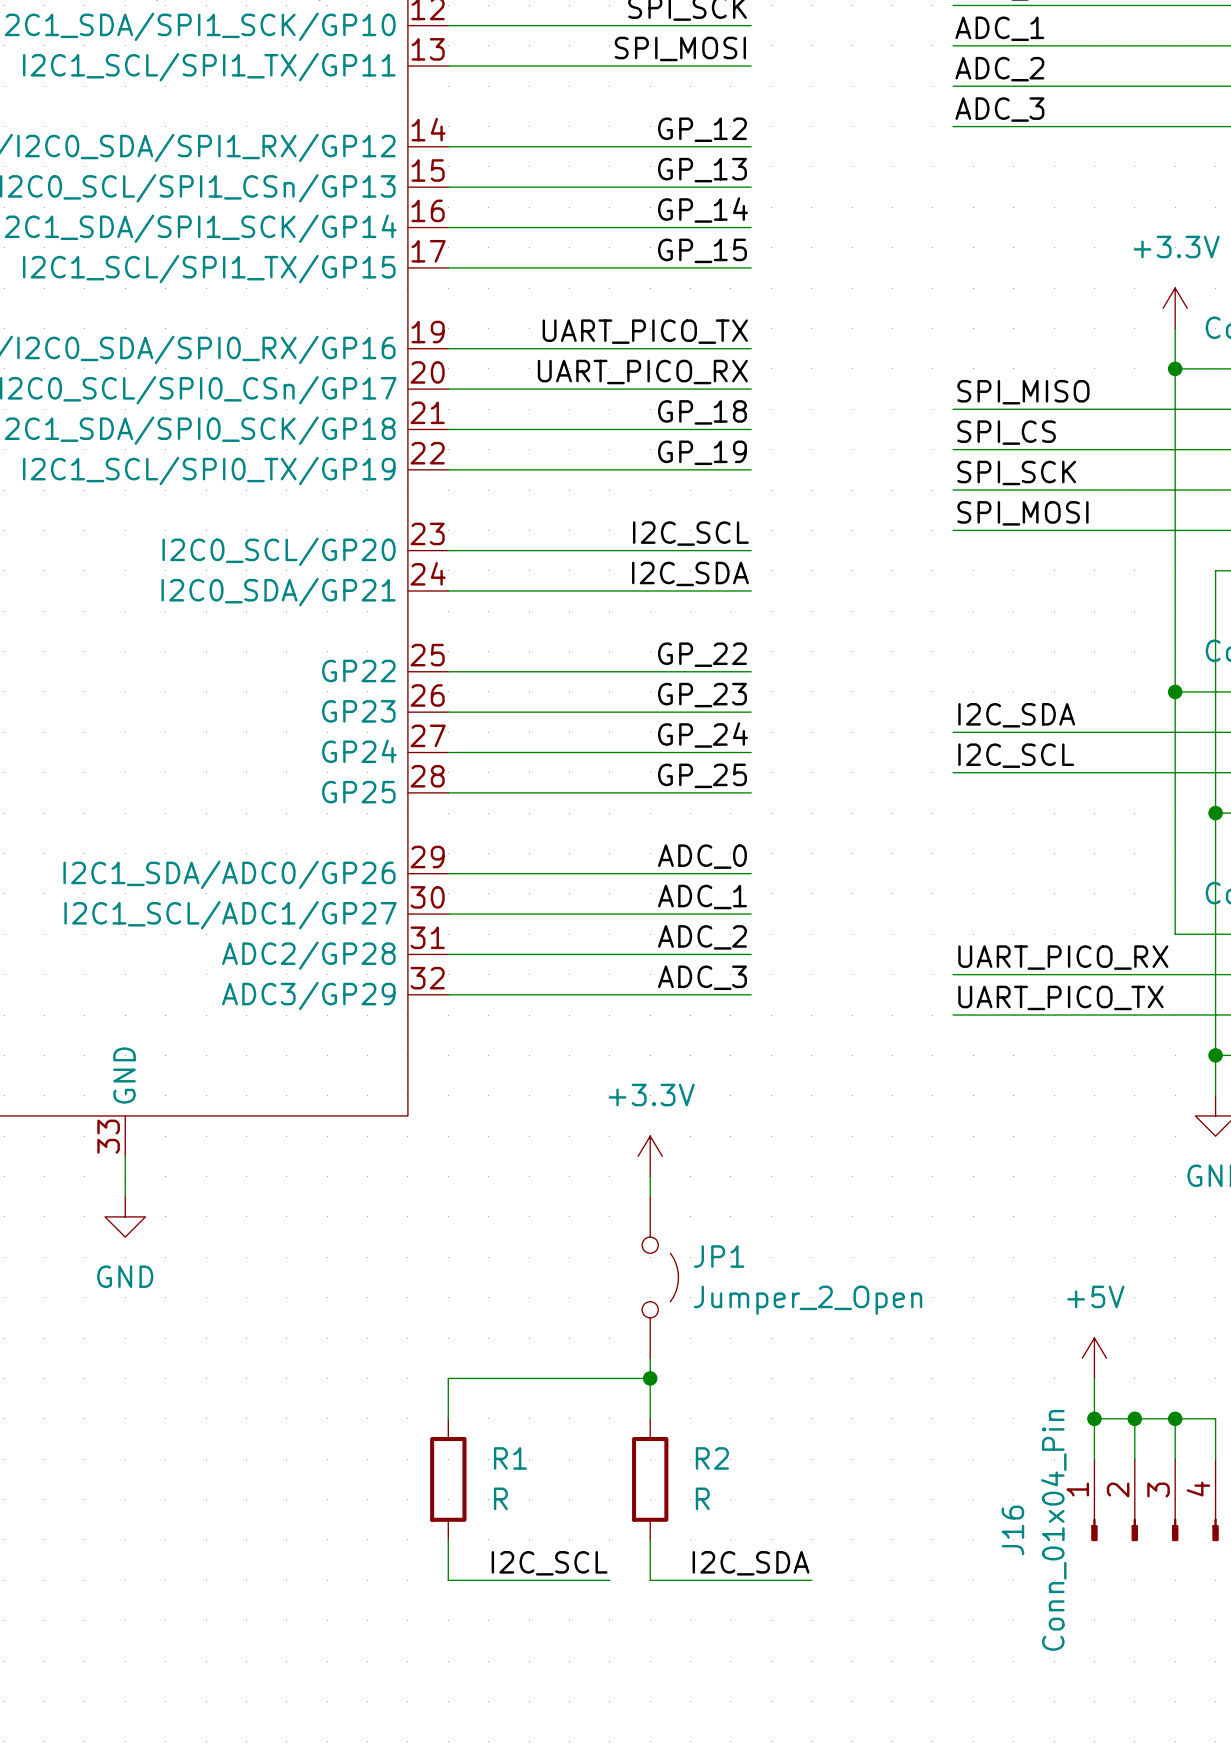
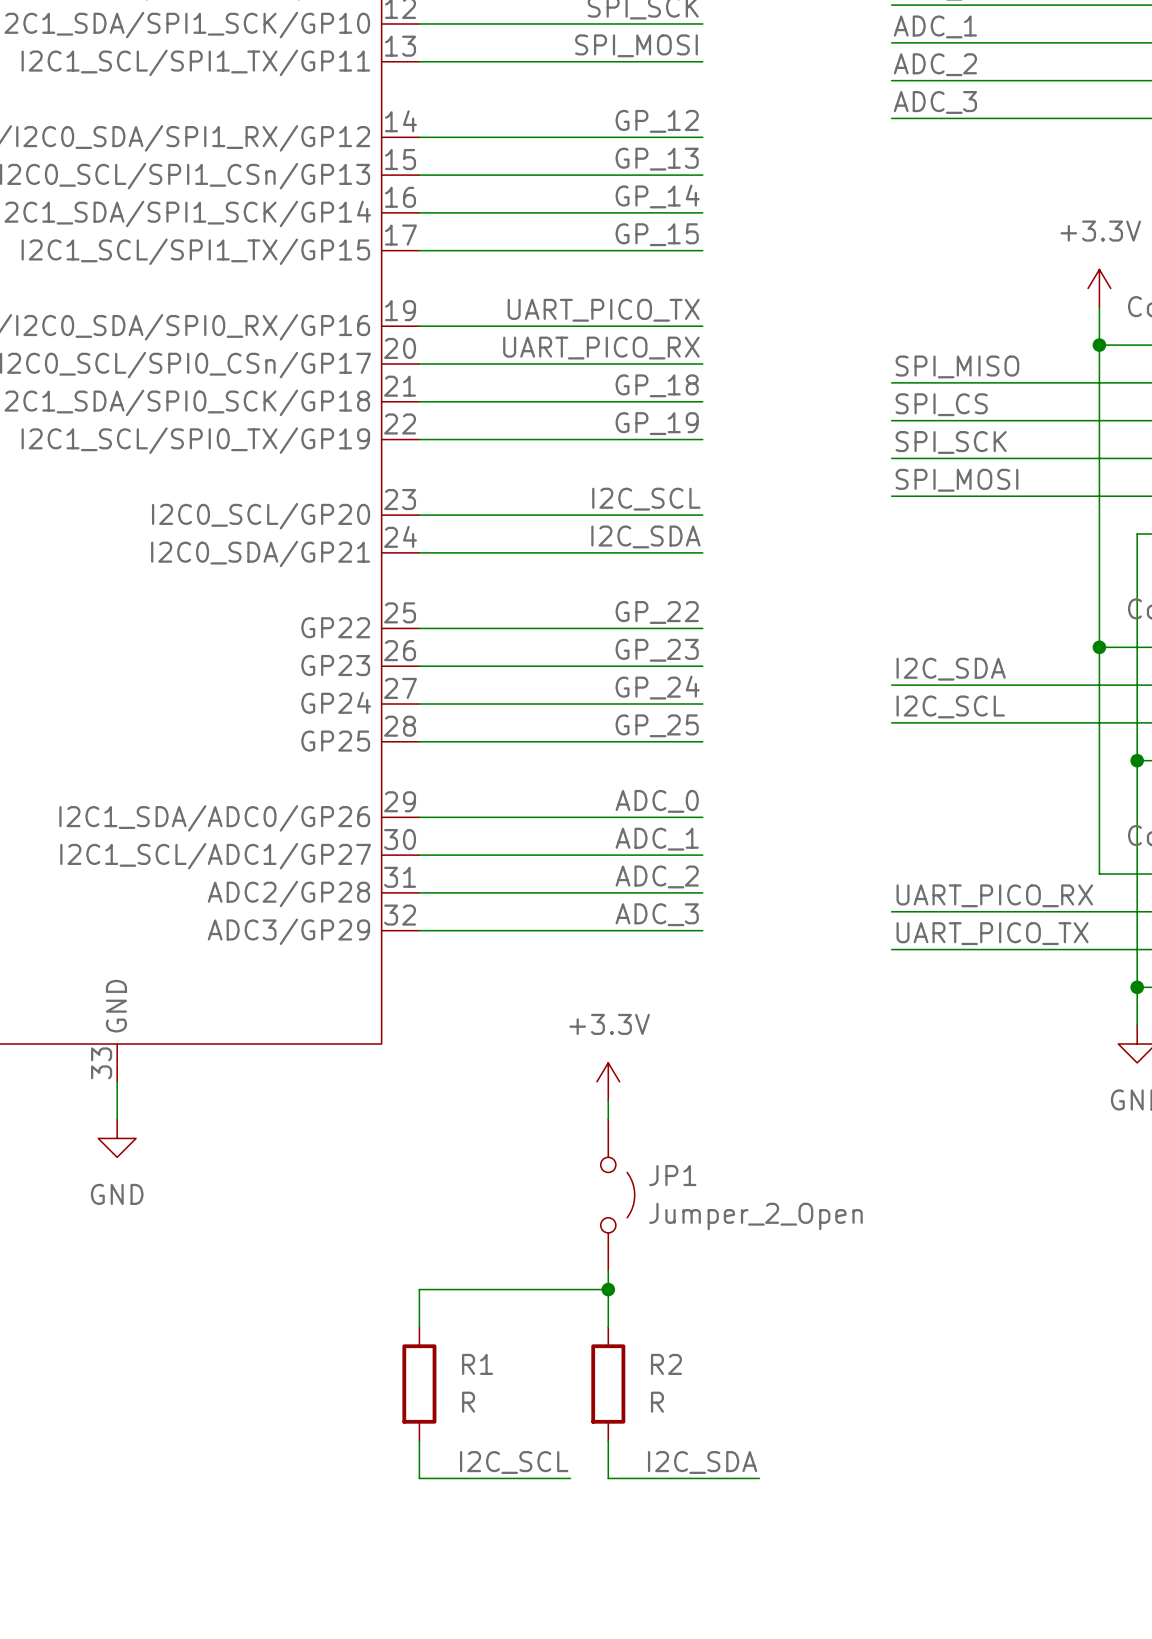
power symbol: +5V (1094, 1358) -> none
wire: (1094, 1378) (1094, 1459) -> none
wire: (1094, 1418) (1215, 1418) (1215, 1459) -> none
junction: (1094, 1418) -> none
wire: (1134, 1418) (1134, 1459) -> none
junction: (1134, 1418) -> none
wire: (1175, 1418) (1175, 1459) -> none
junction: (1175, 1418) -> none
J16: Conn_01x04_Pin (1154, 1500) -> none

